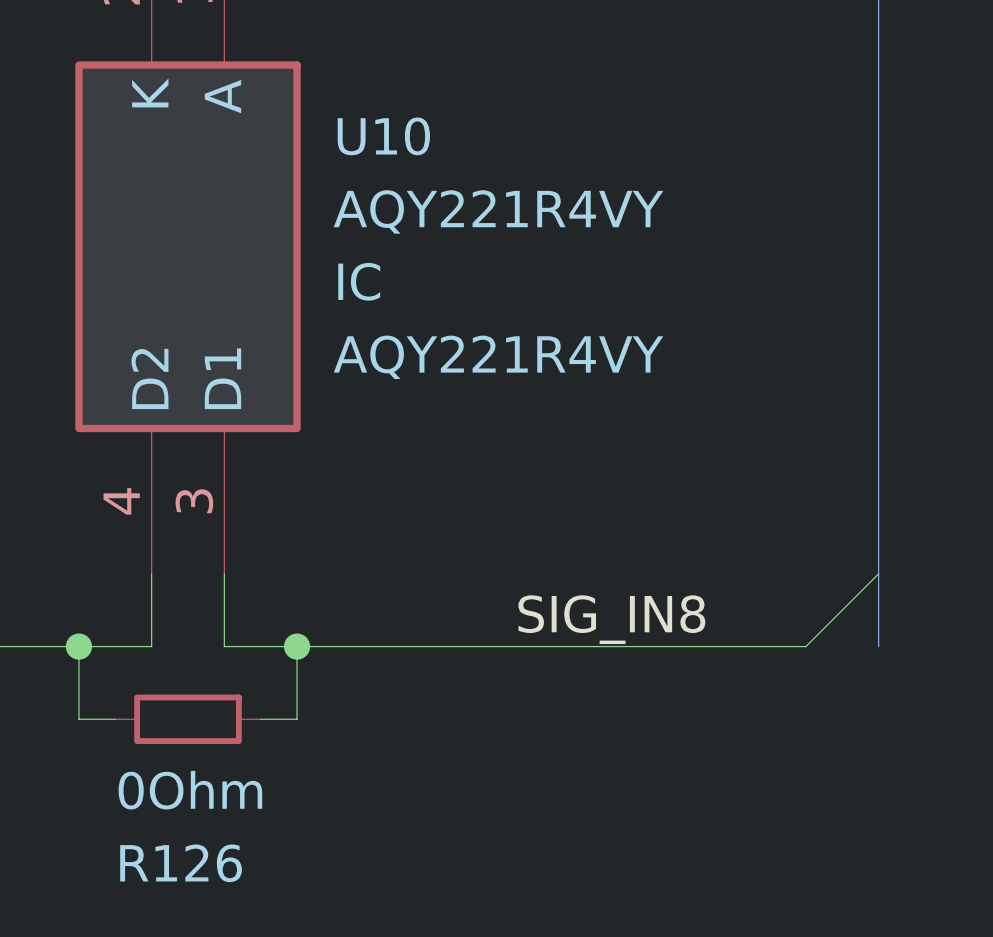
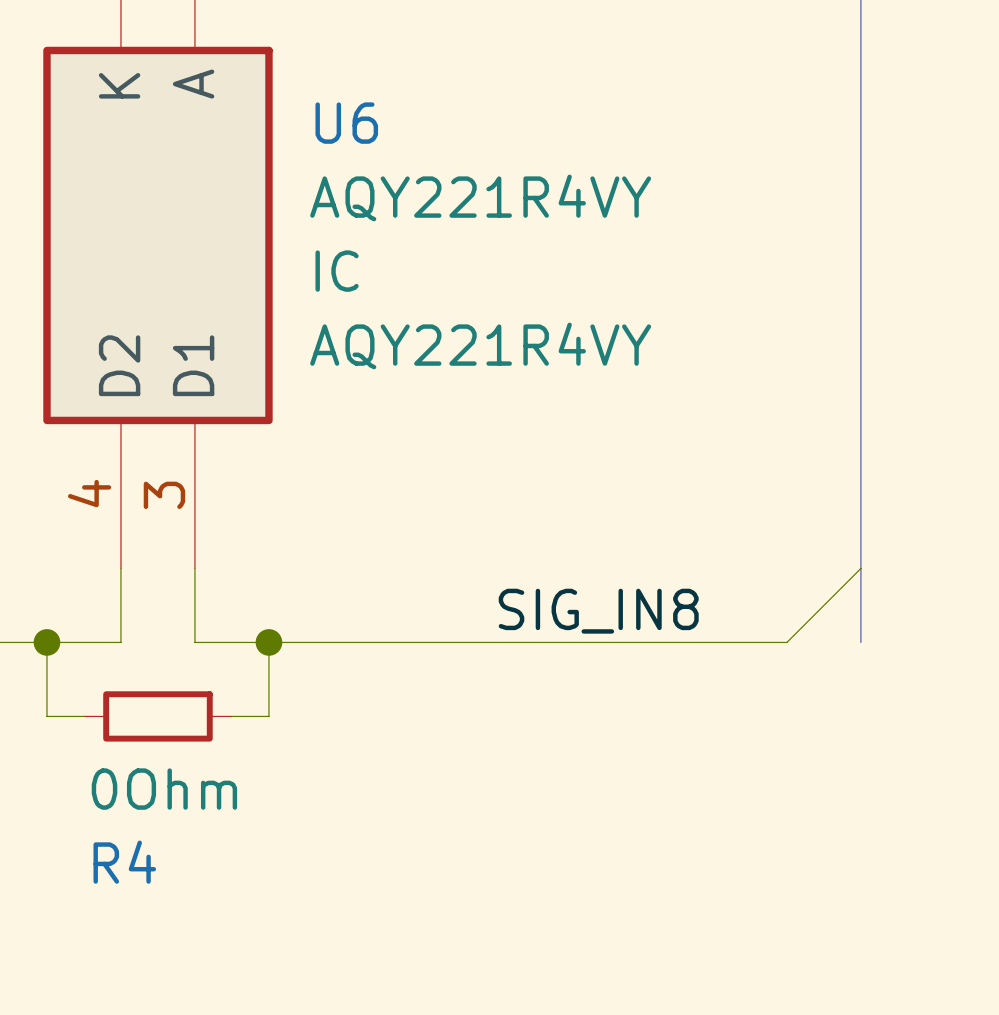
U10 name: U10 (383, 136) -> U6 (346, 123)
R126 name: R126 (181, 863) -> R4 (124, 862)

